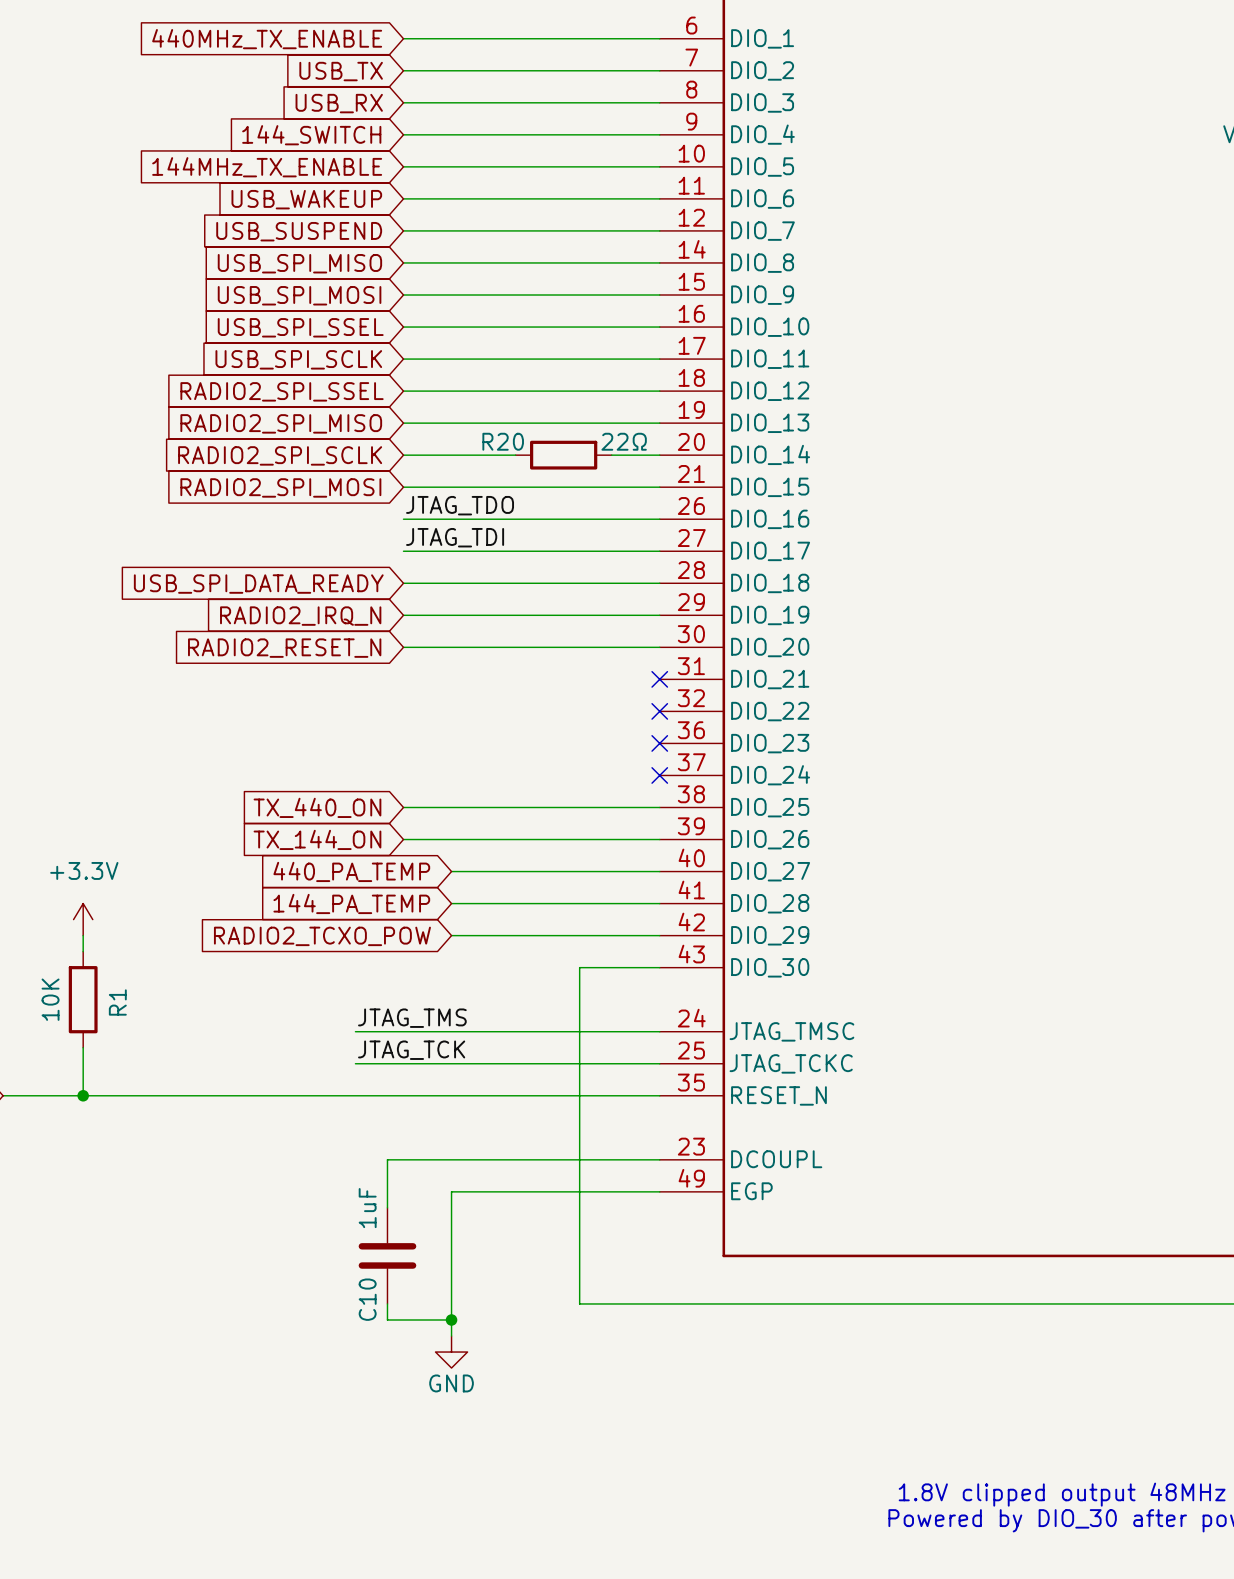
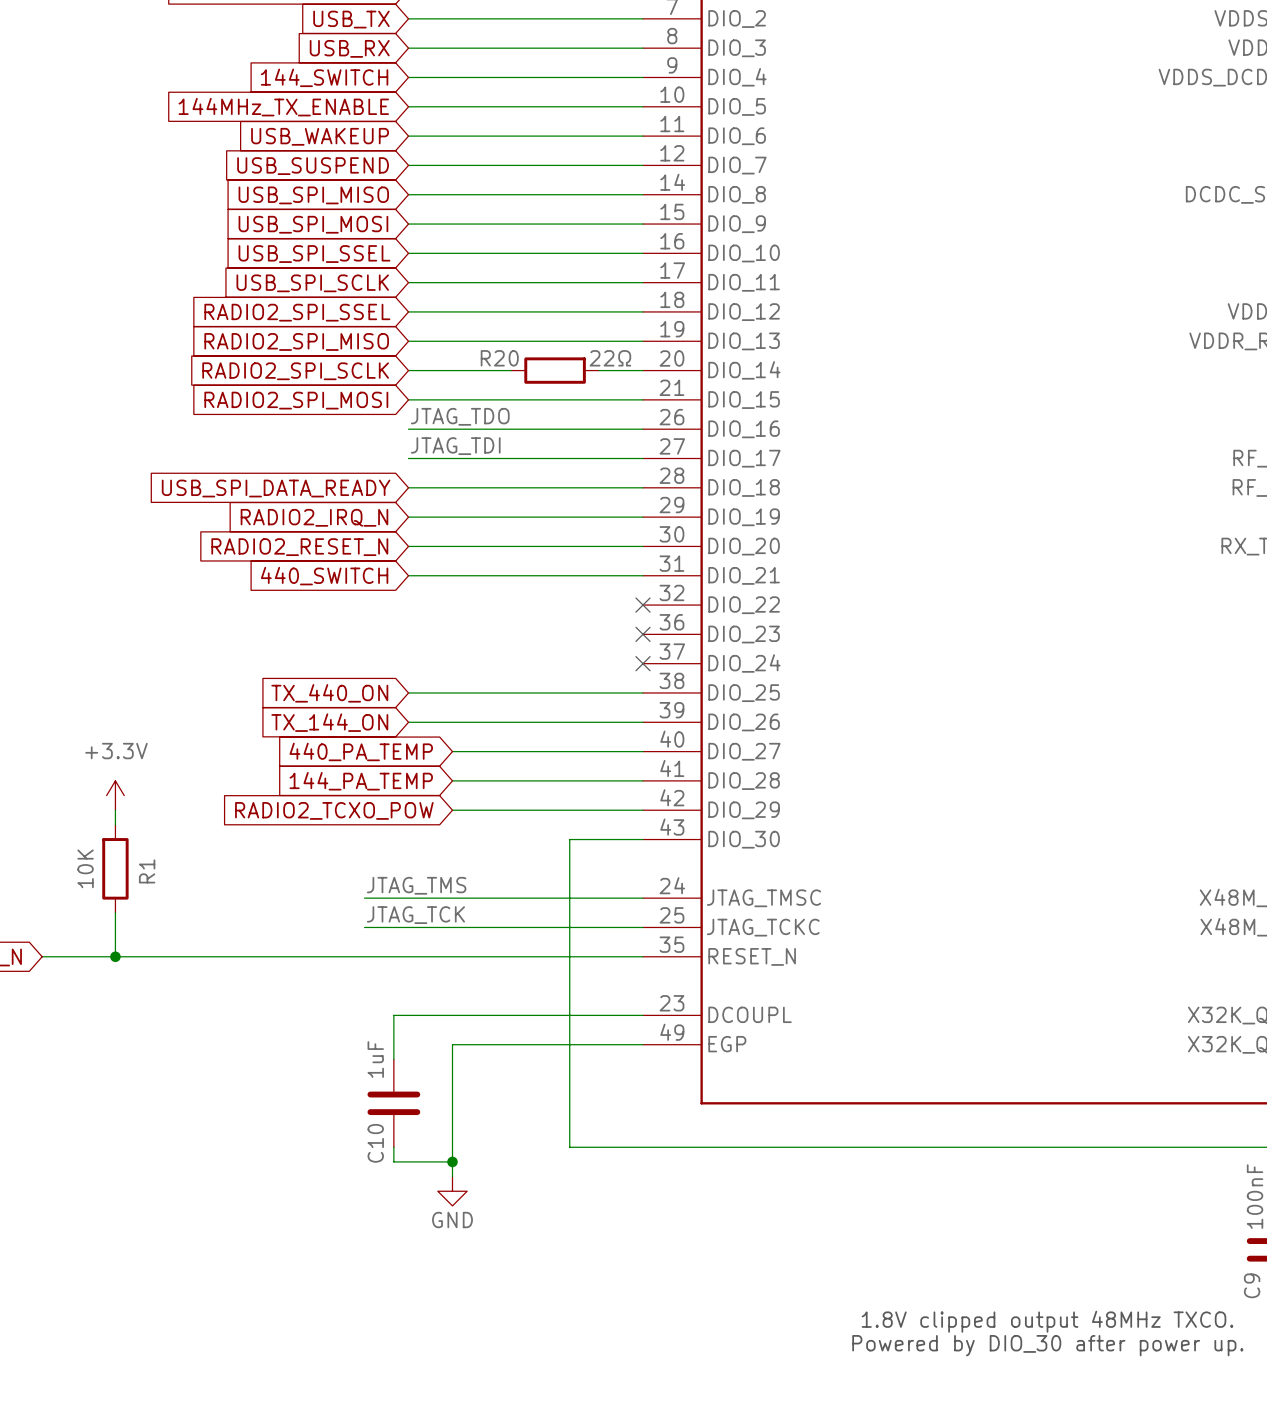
global label: none -> 440_SWITCH (324, 576)
wire: none -> (408, 575) (643, 575)
no-connect mark: (659, 679) -> none

